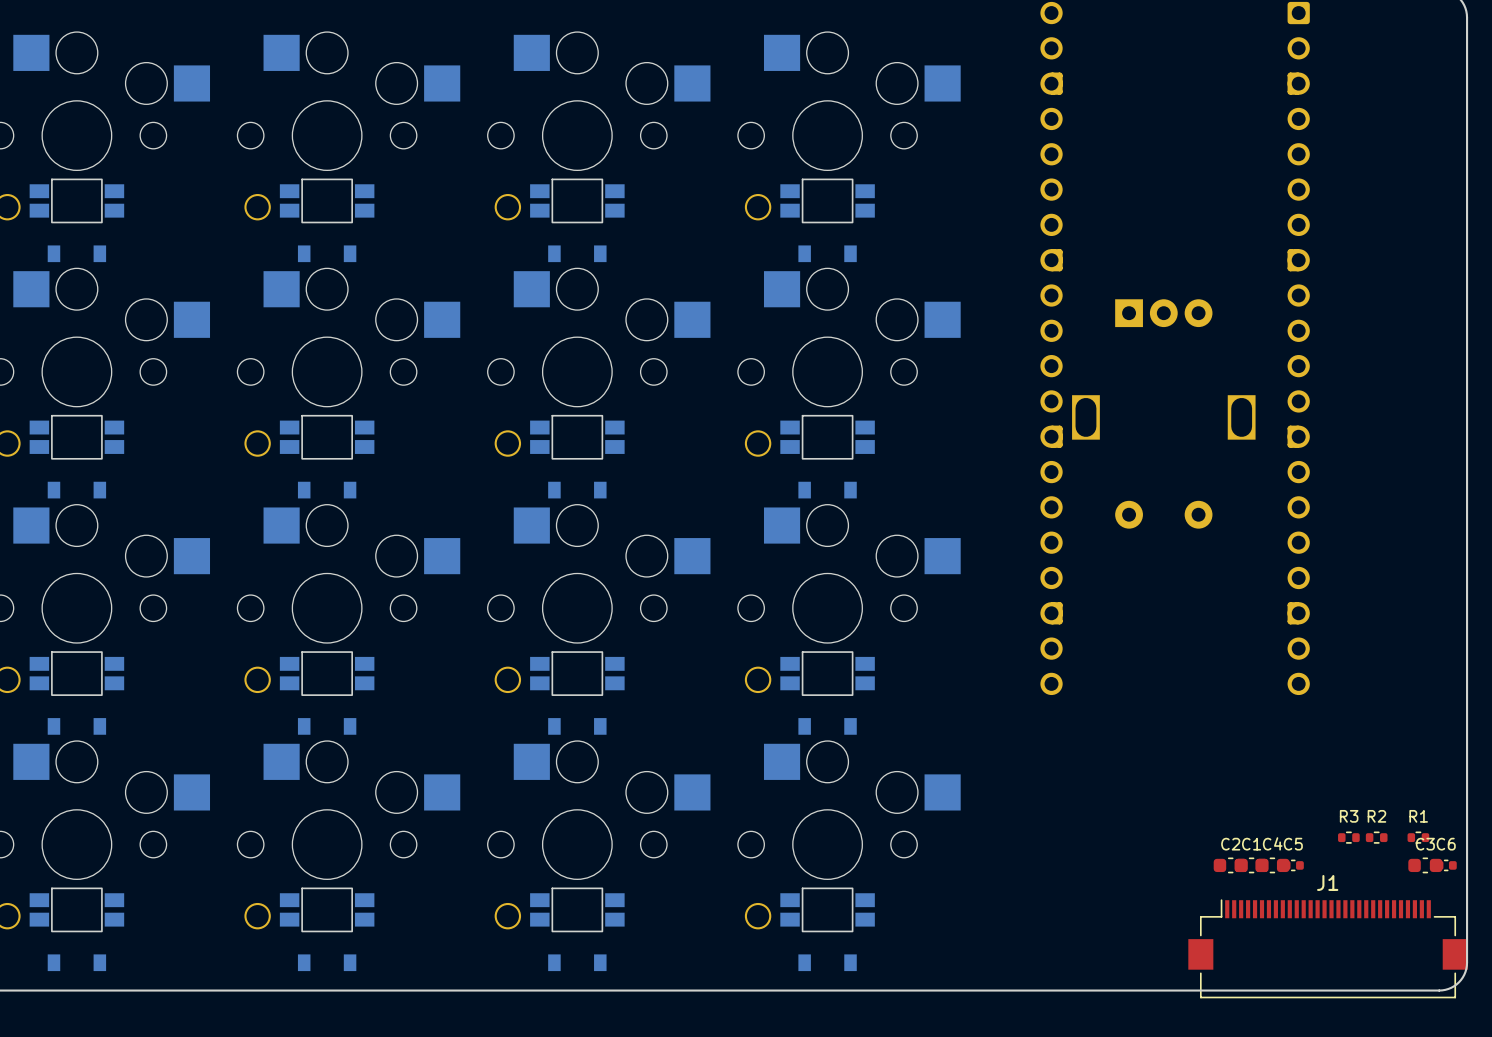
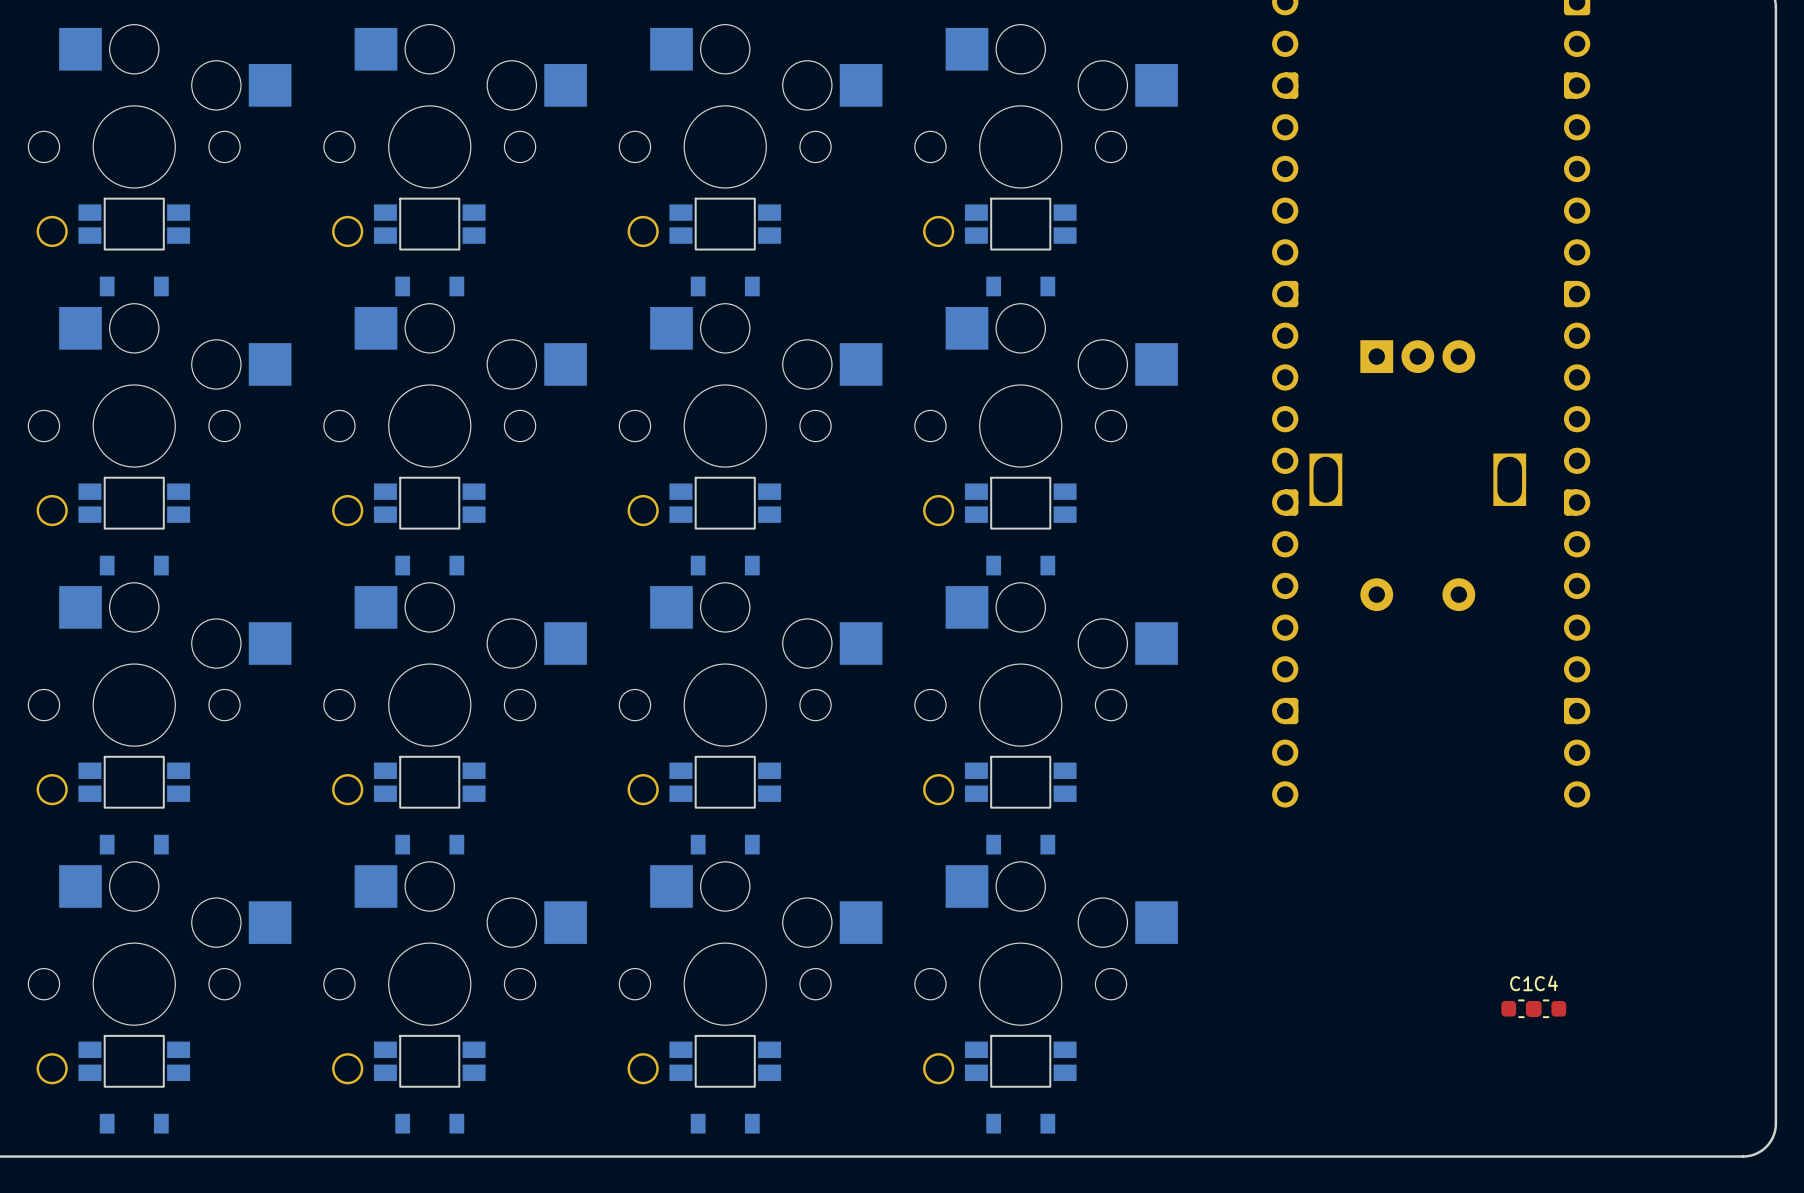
R3: (1348, 837) -> none
R2: (1376, 837) -> none
R1: (1418, 837) -> none
C2: (1230, 865) -> none
C5: (1293, 865) -> none
C3: (1425, 865) -> none
C6: (1446, 865) -> none
J1: (1328, 948) -> none

